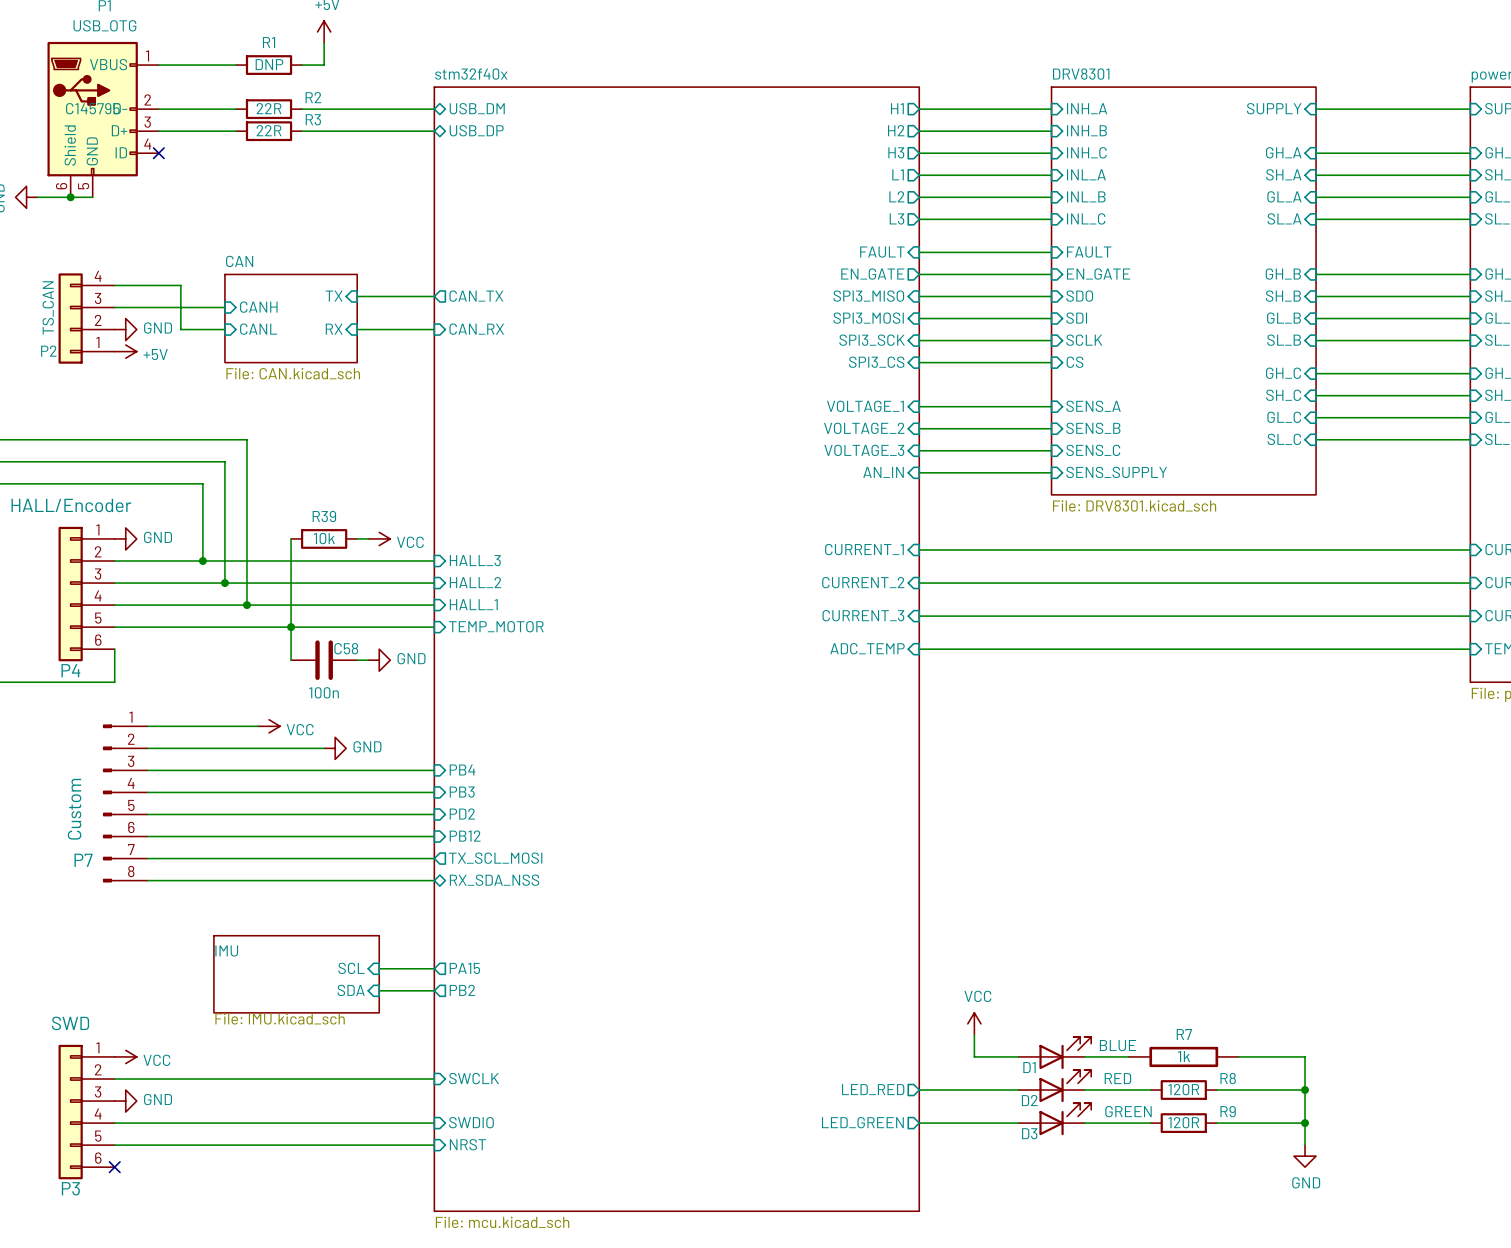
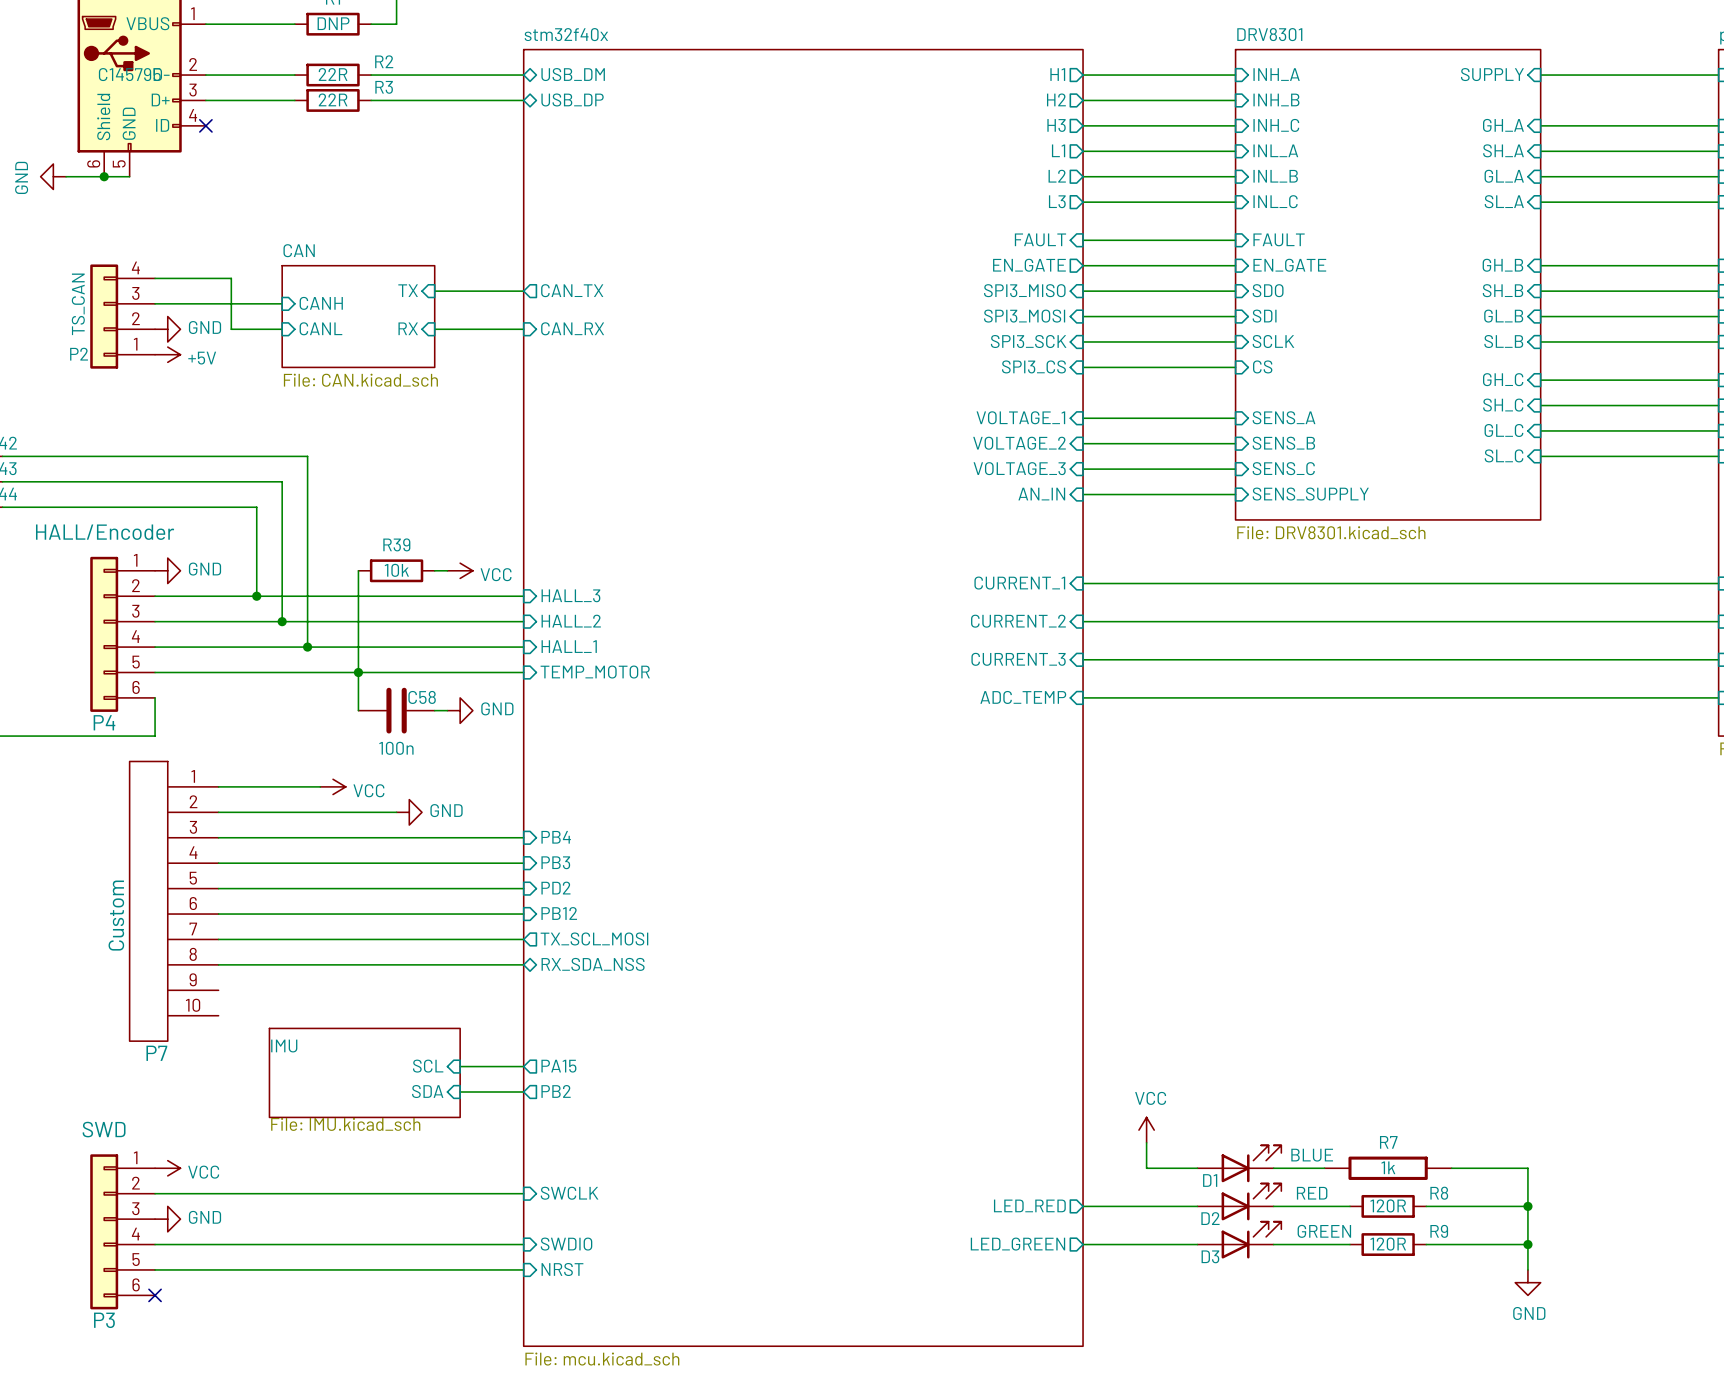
P7 symbol: [103, 724, 148, 883] -> [129, 761, 219, 1042]
P7 name position: P7 (83, 860) -> P7 (156, 1053)

